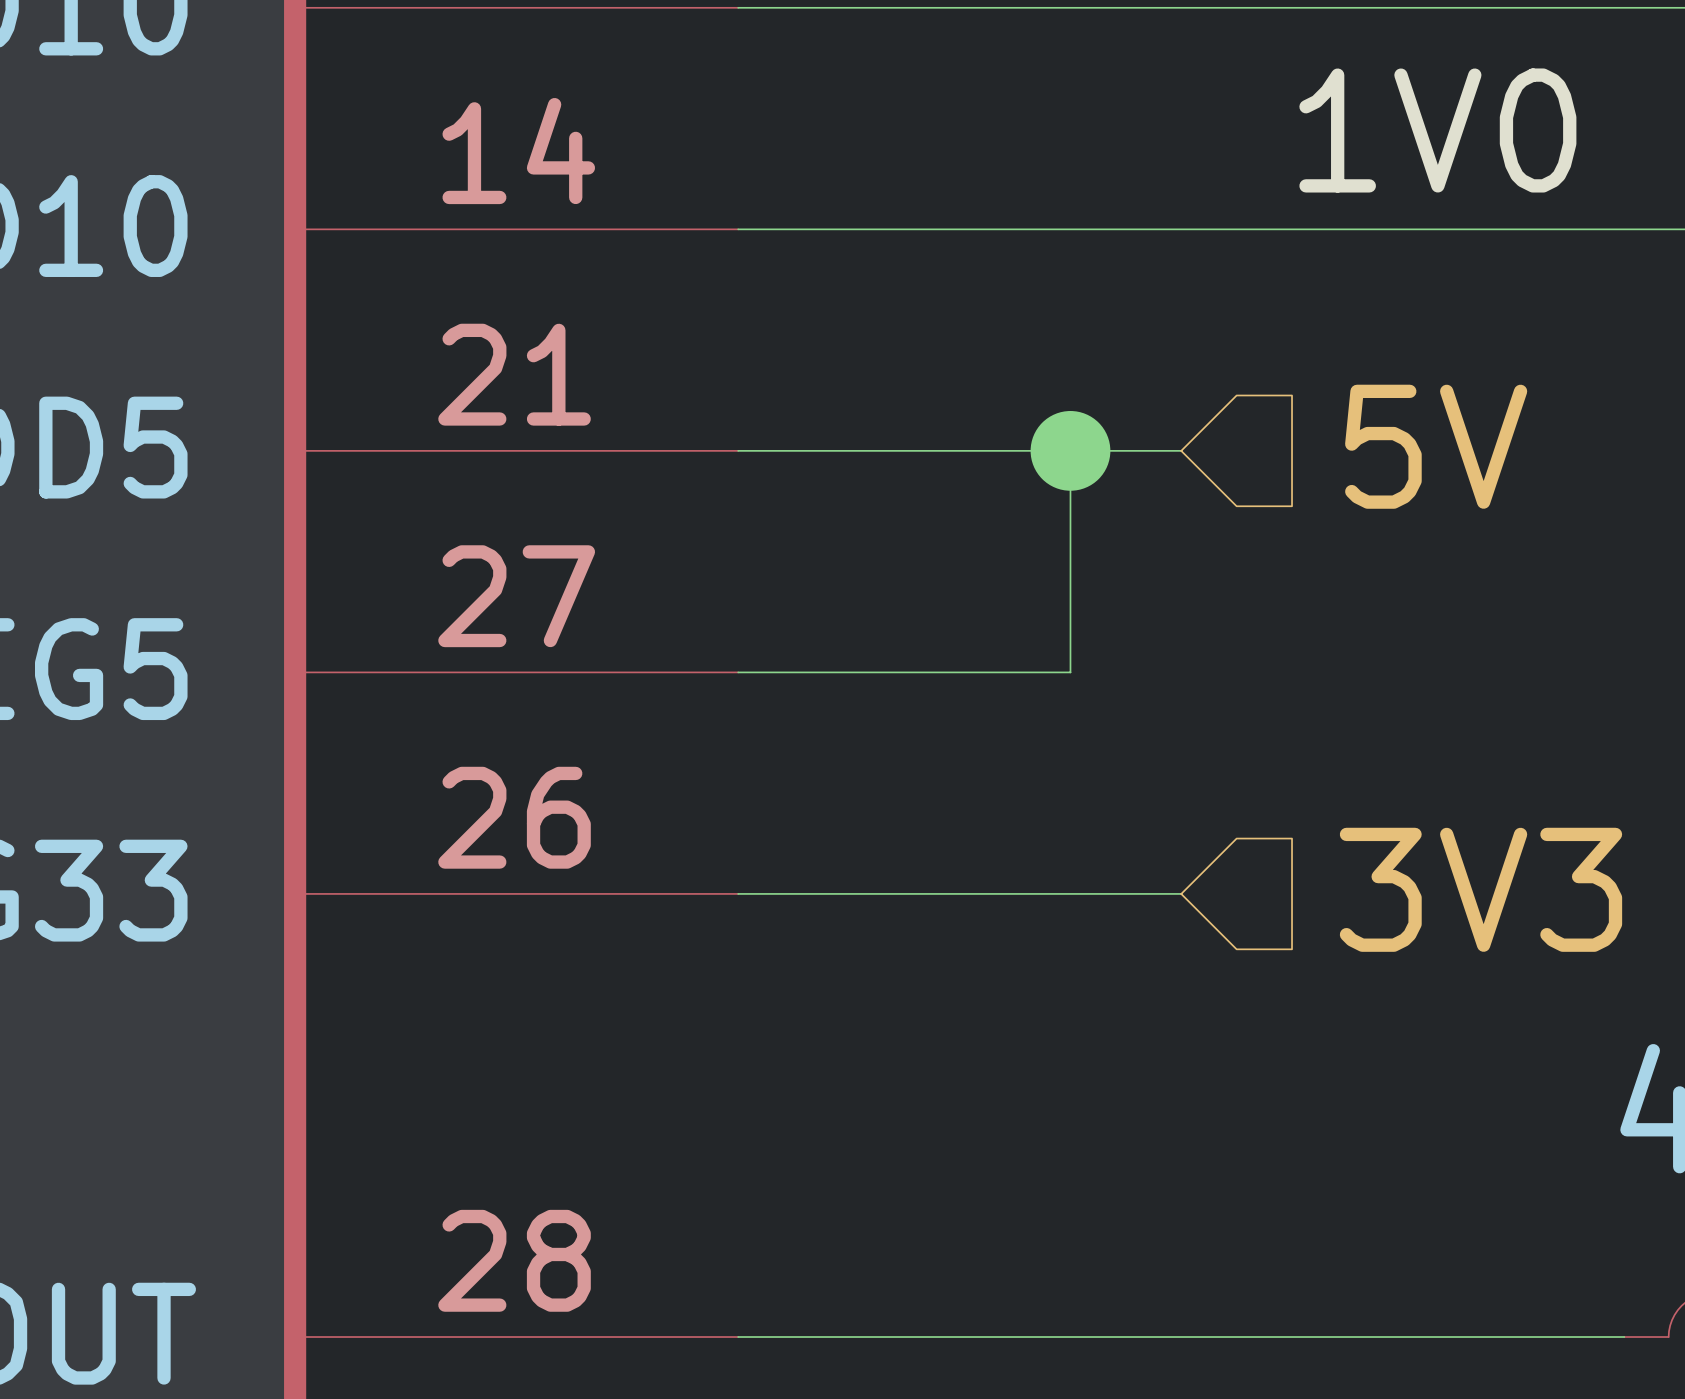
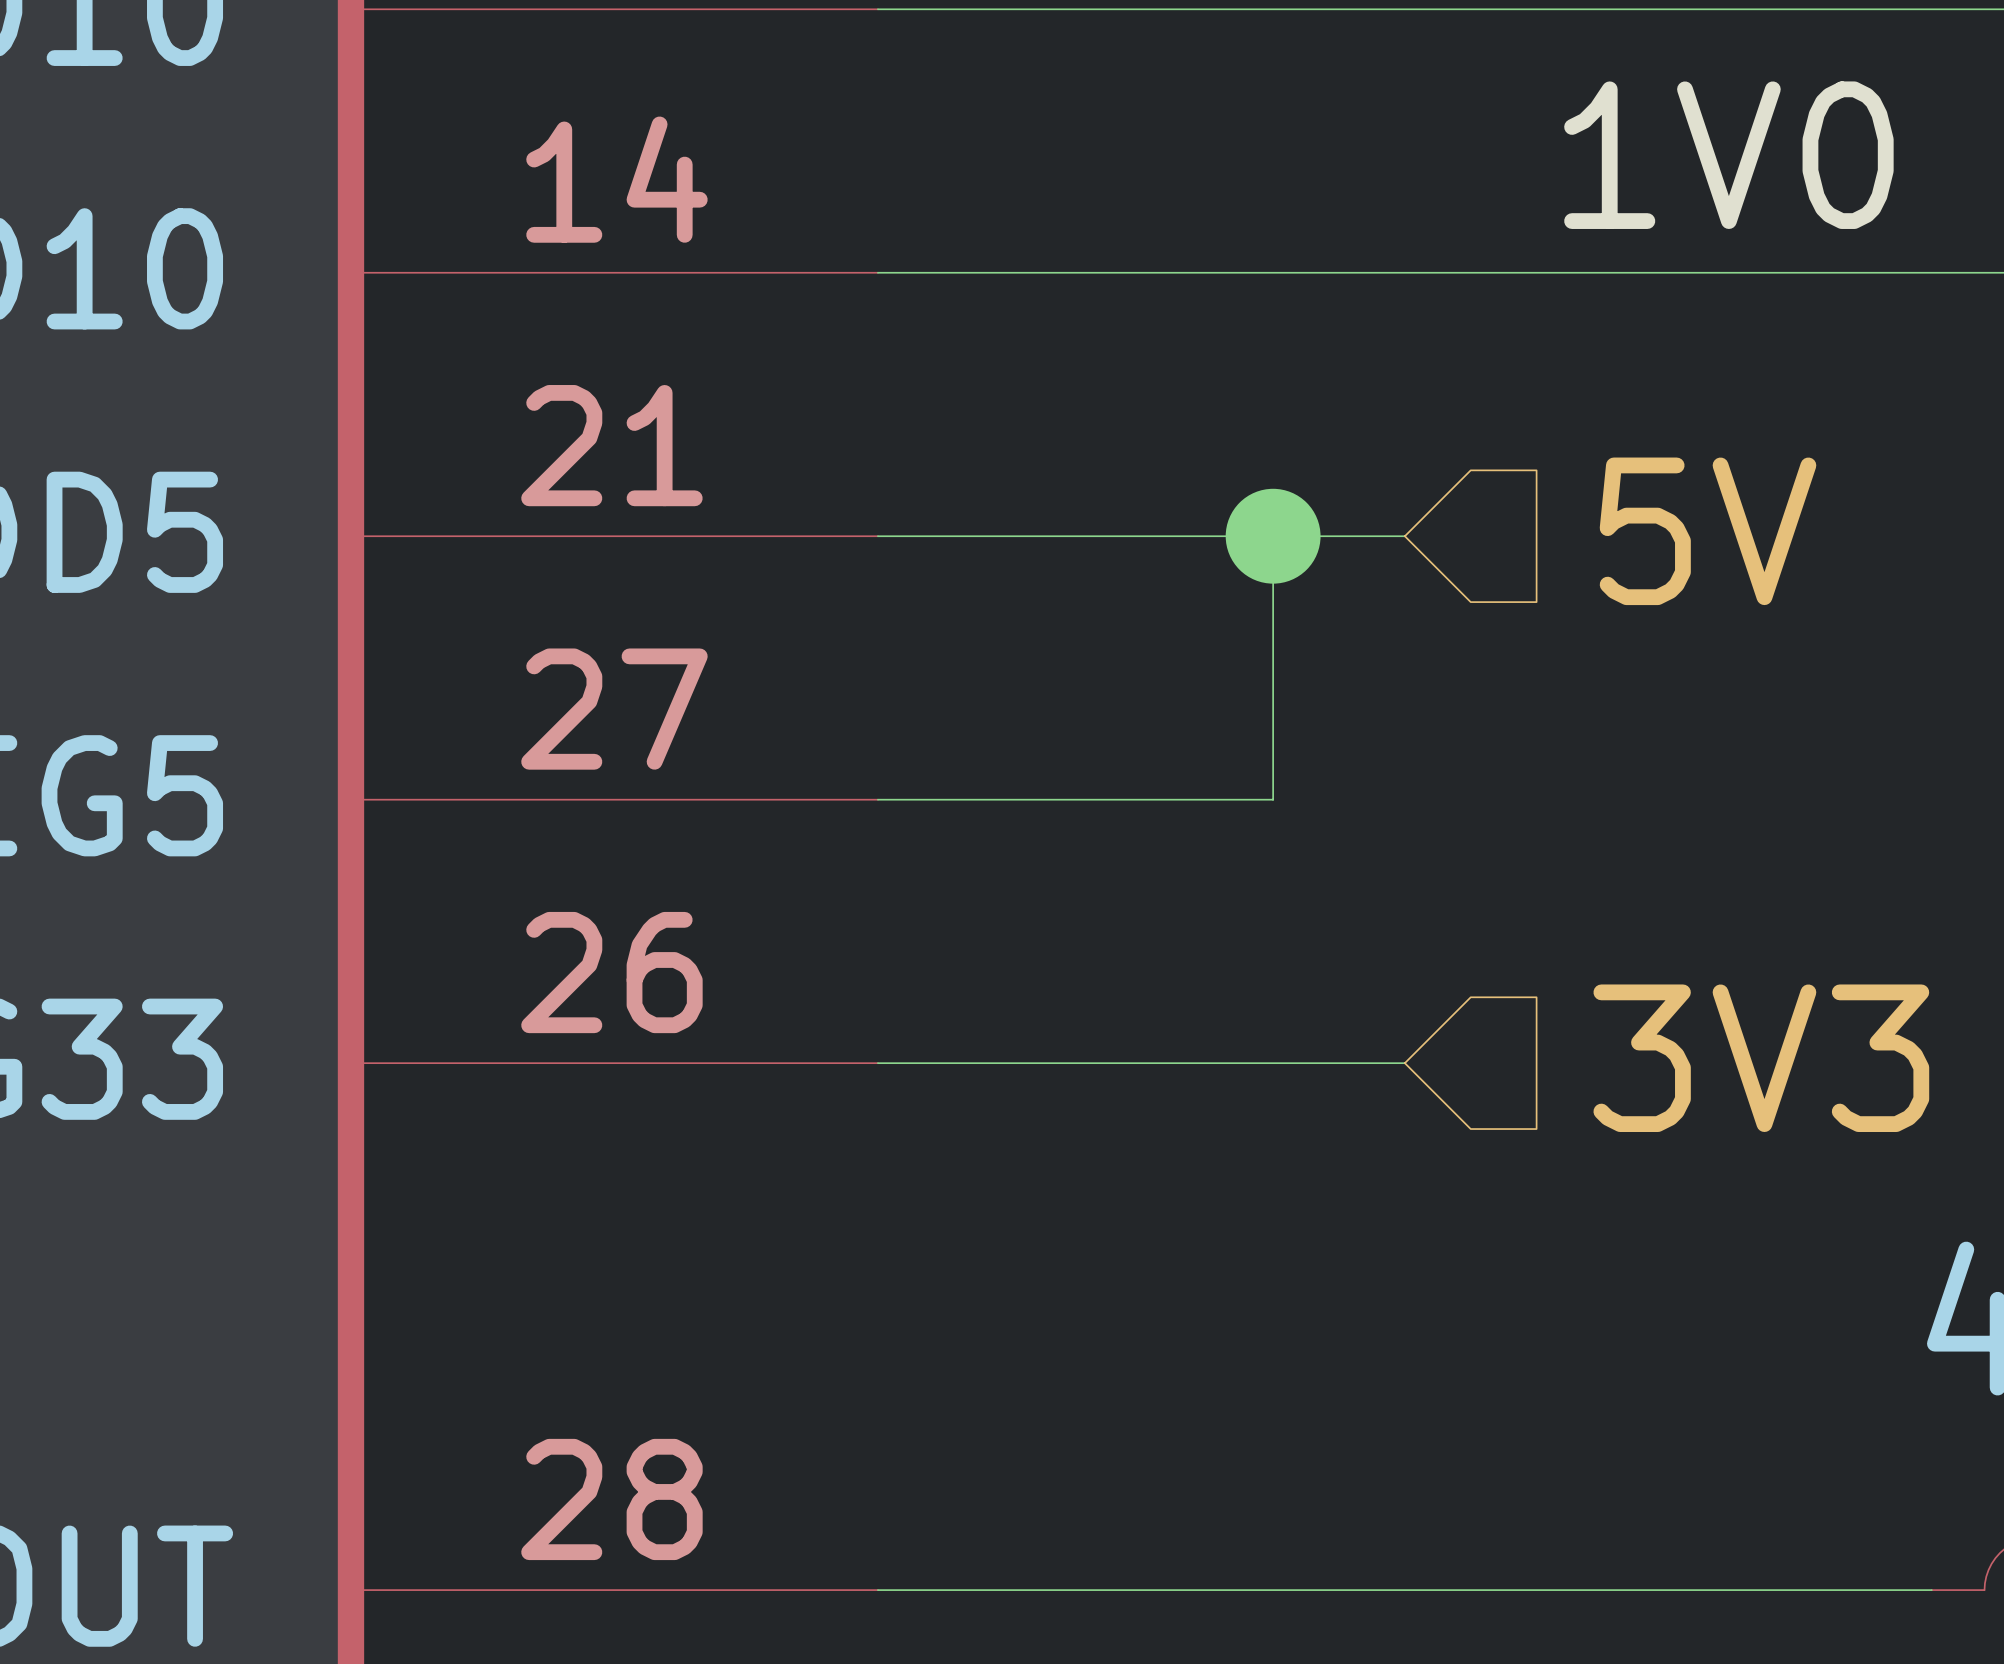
label position: 1V0 (1437, 130) -> 1V0 (1728, 155)

